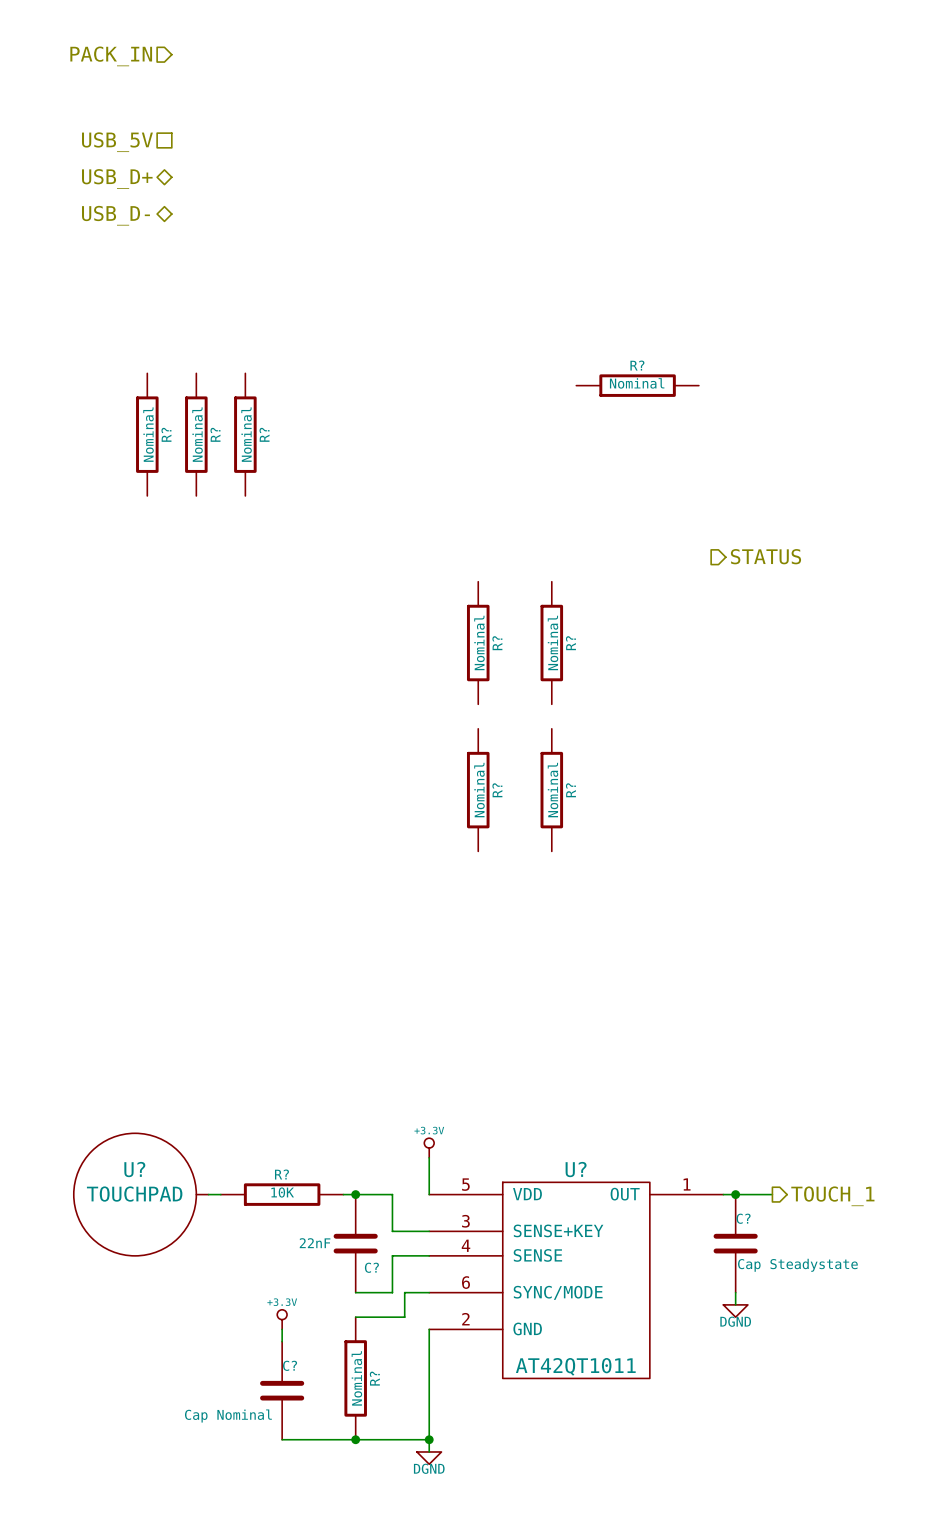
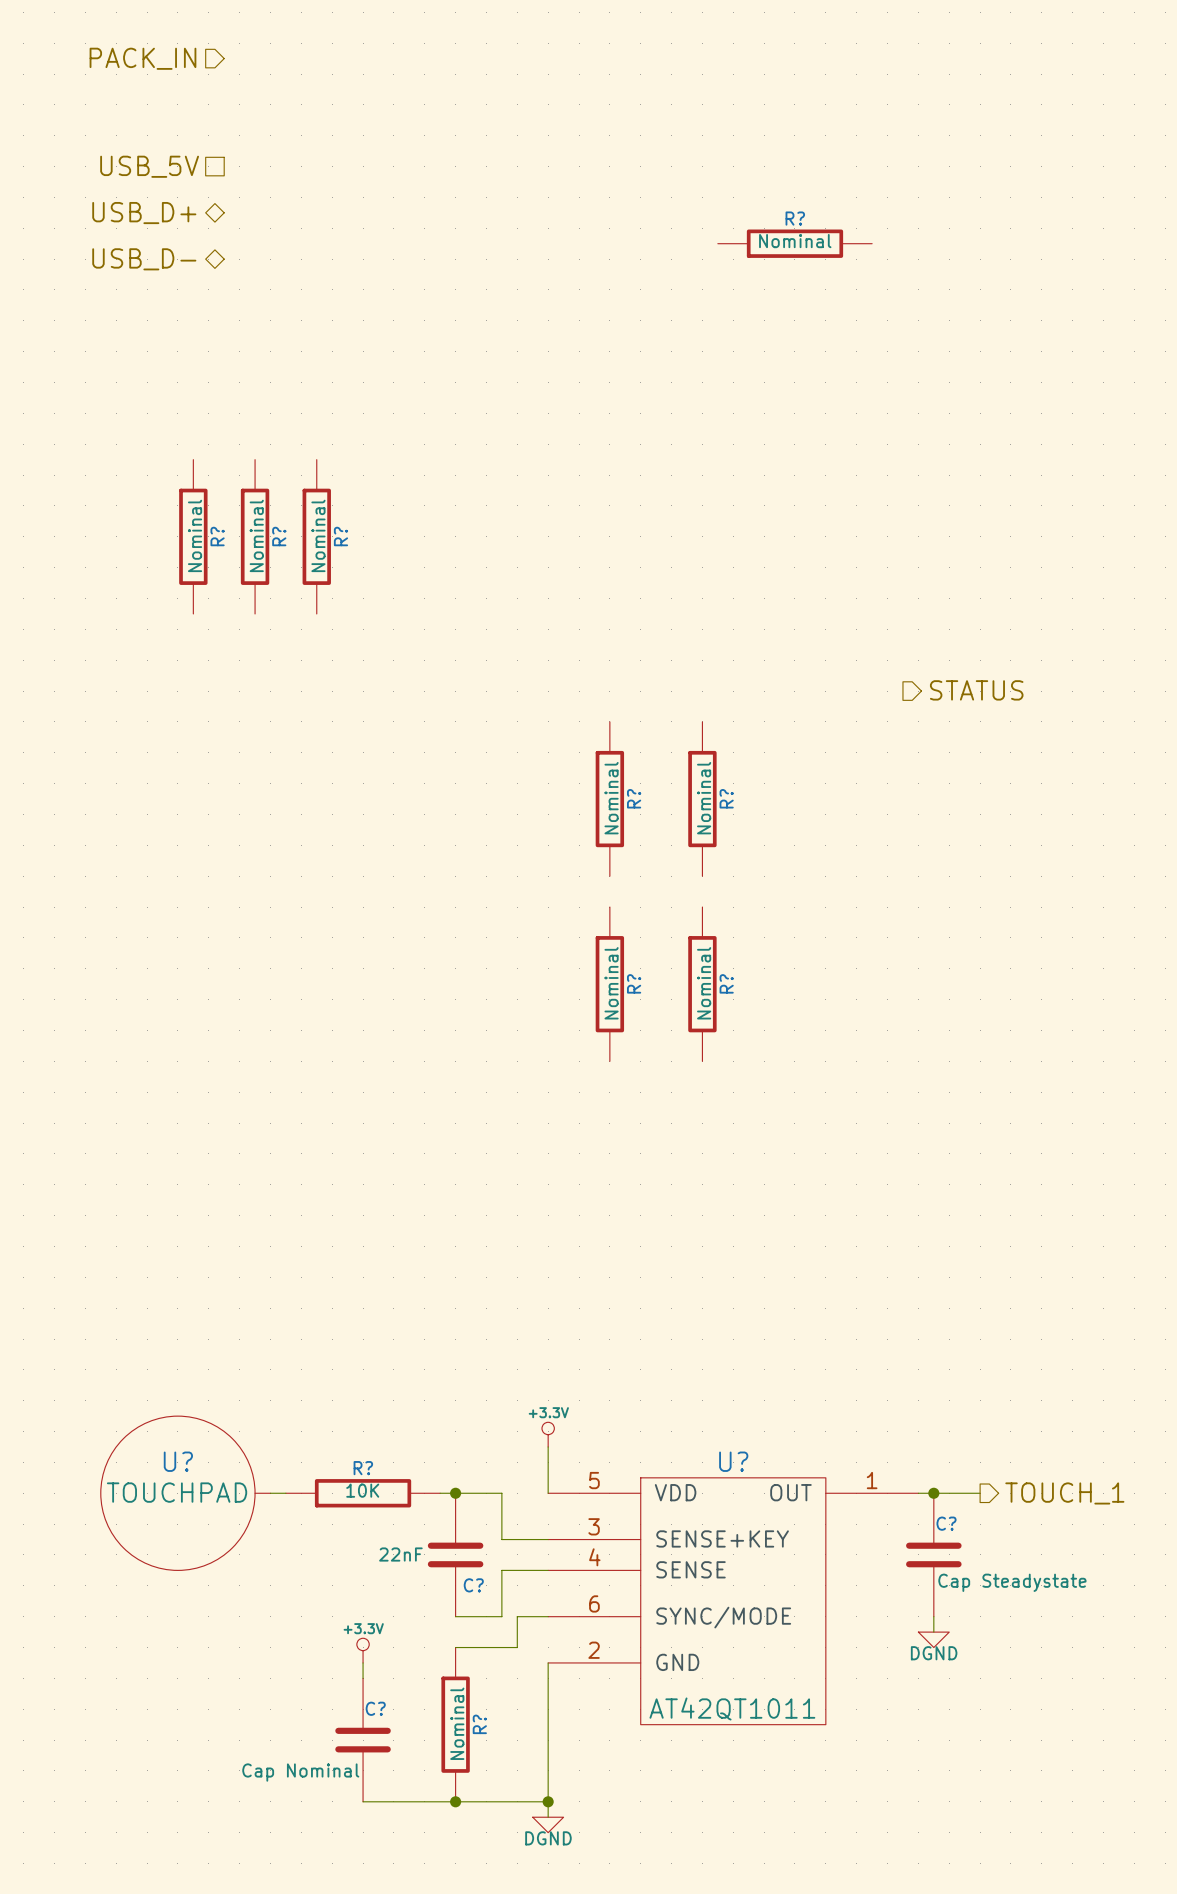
R? position: (637, 385) -> (794, 243)

